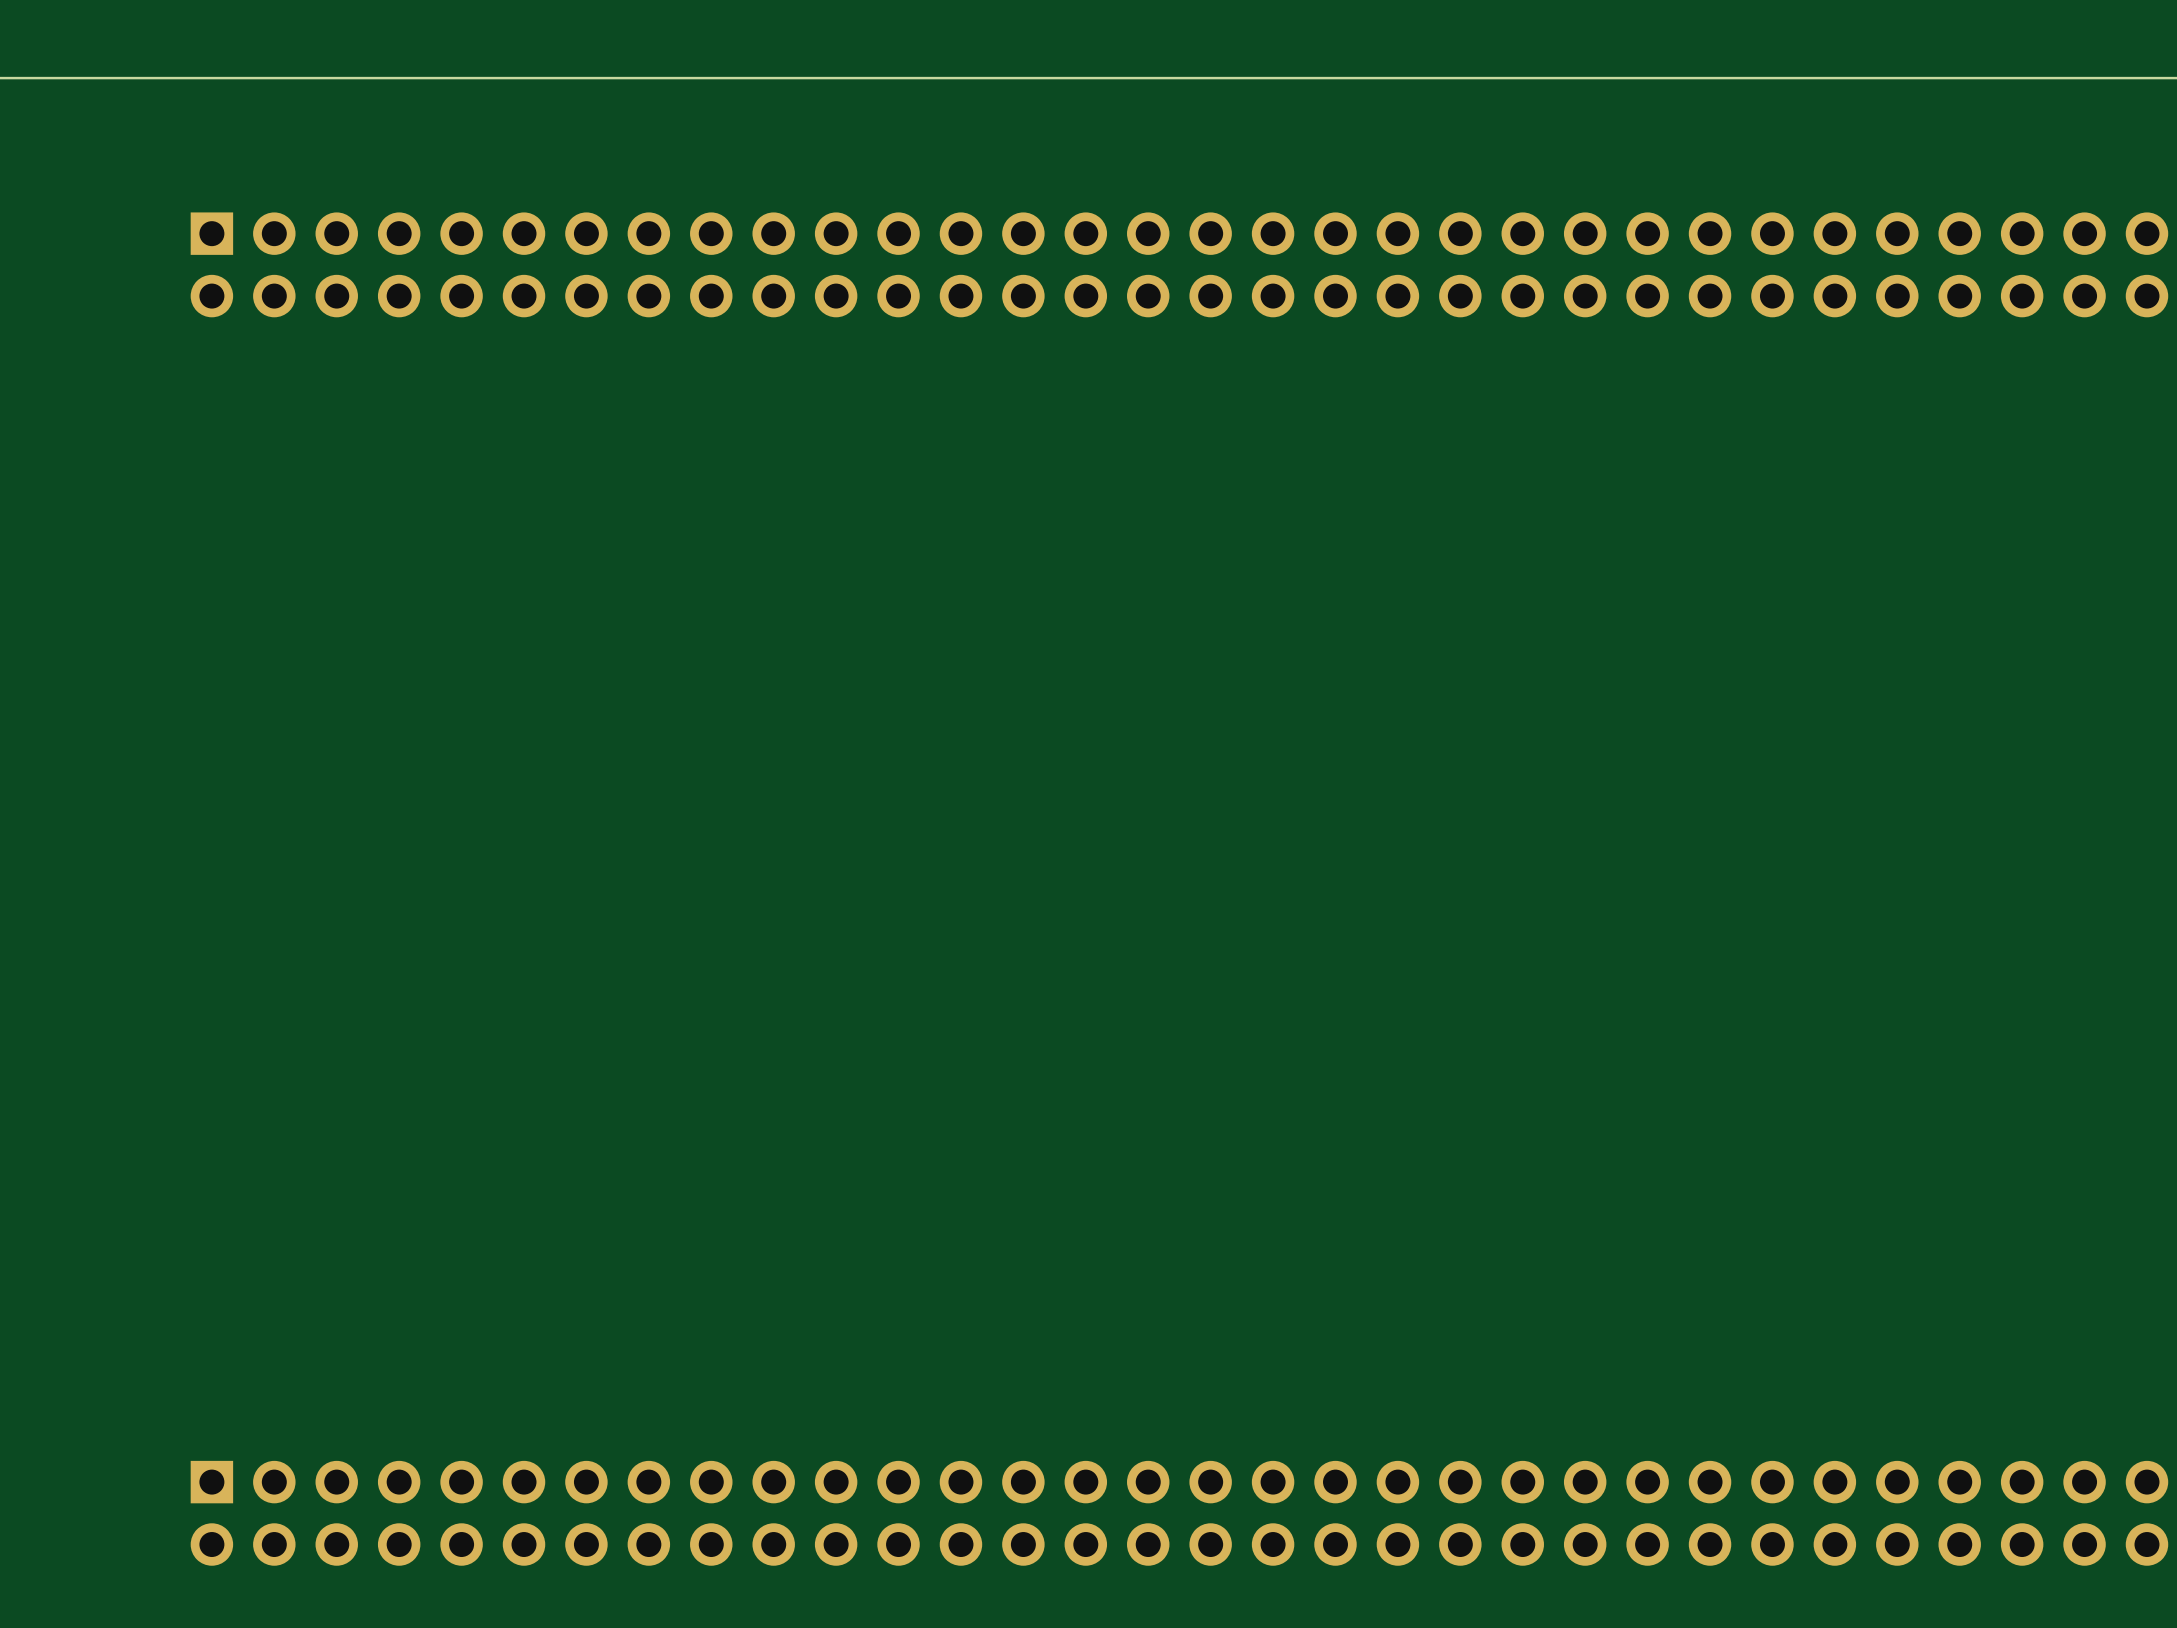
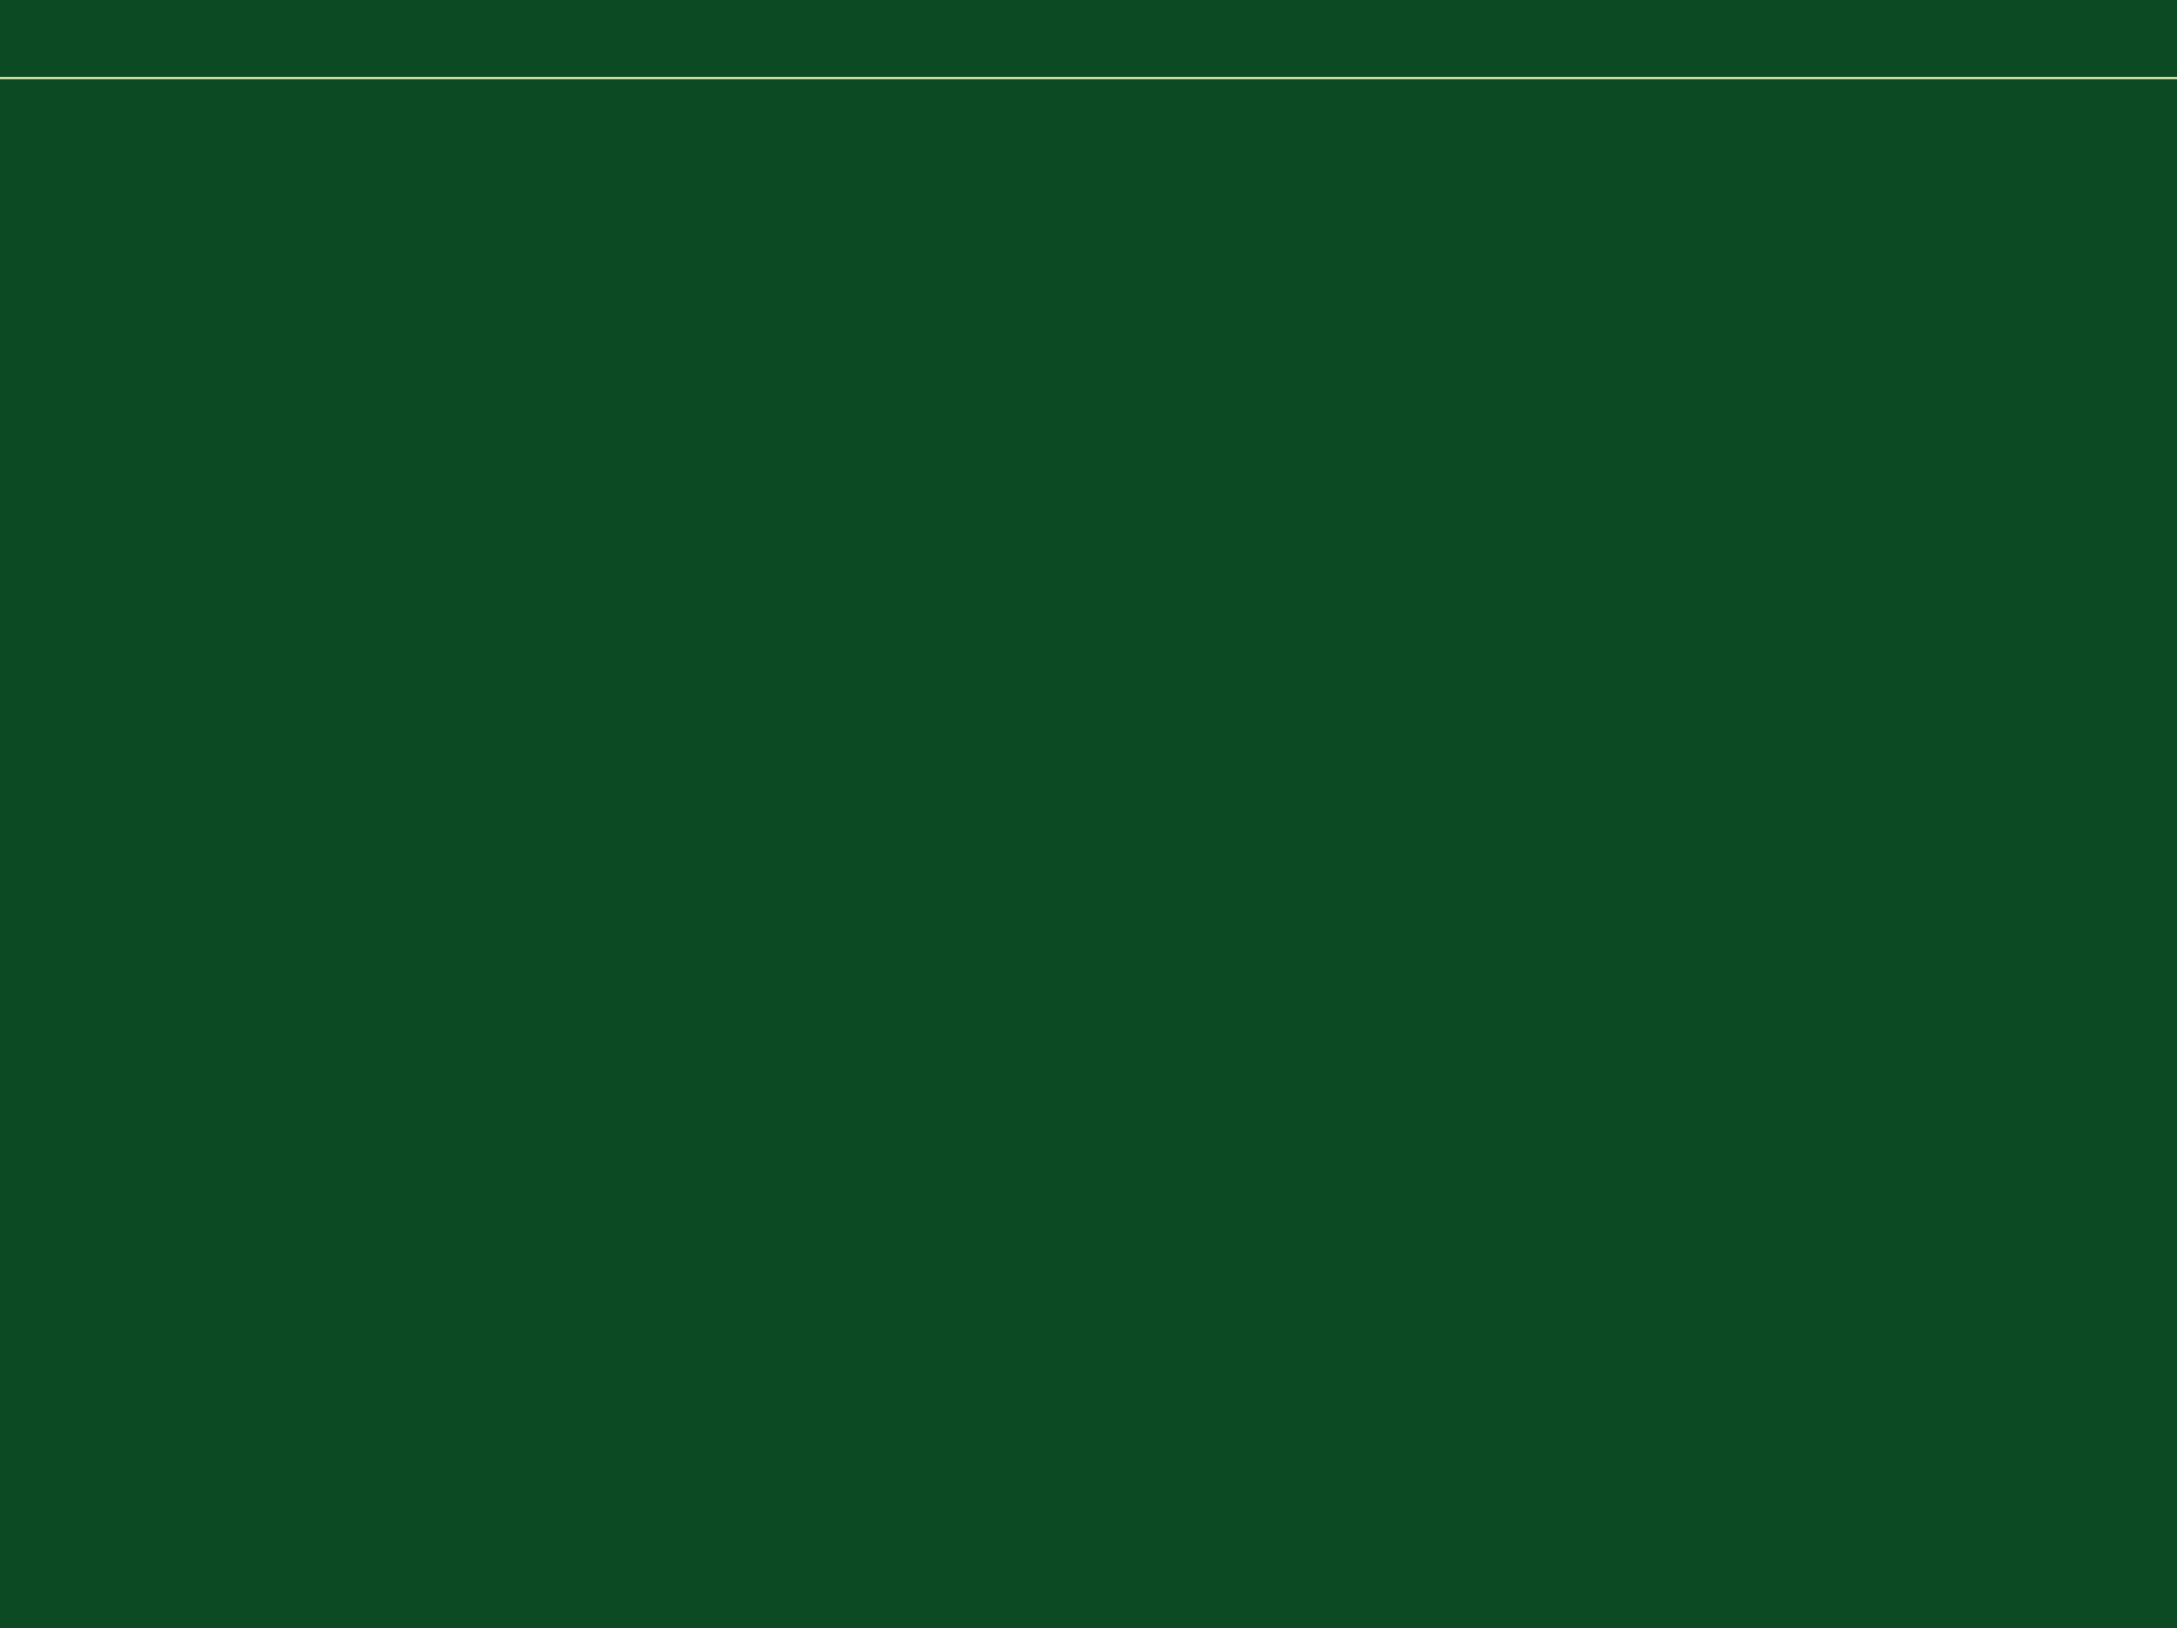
part: (1179, 264) -> none
part: (1179, 1513) -> none

